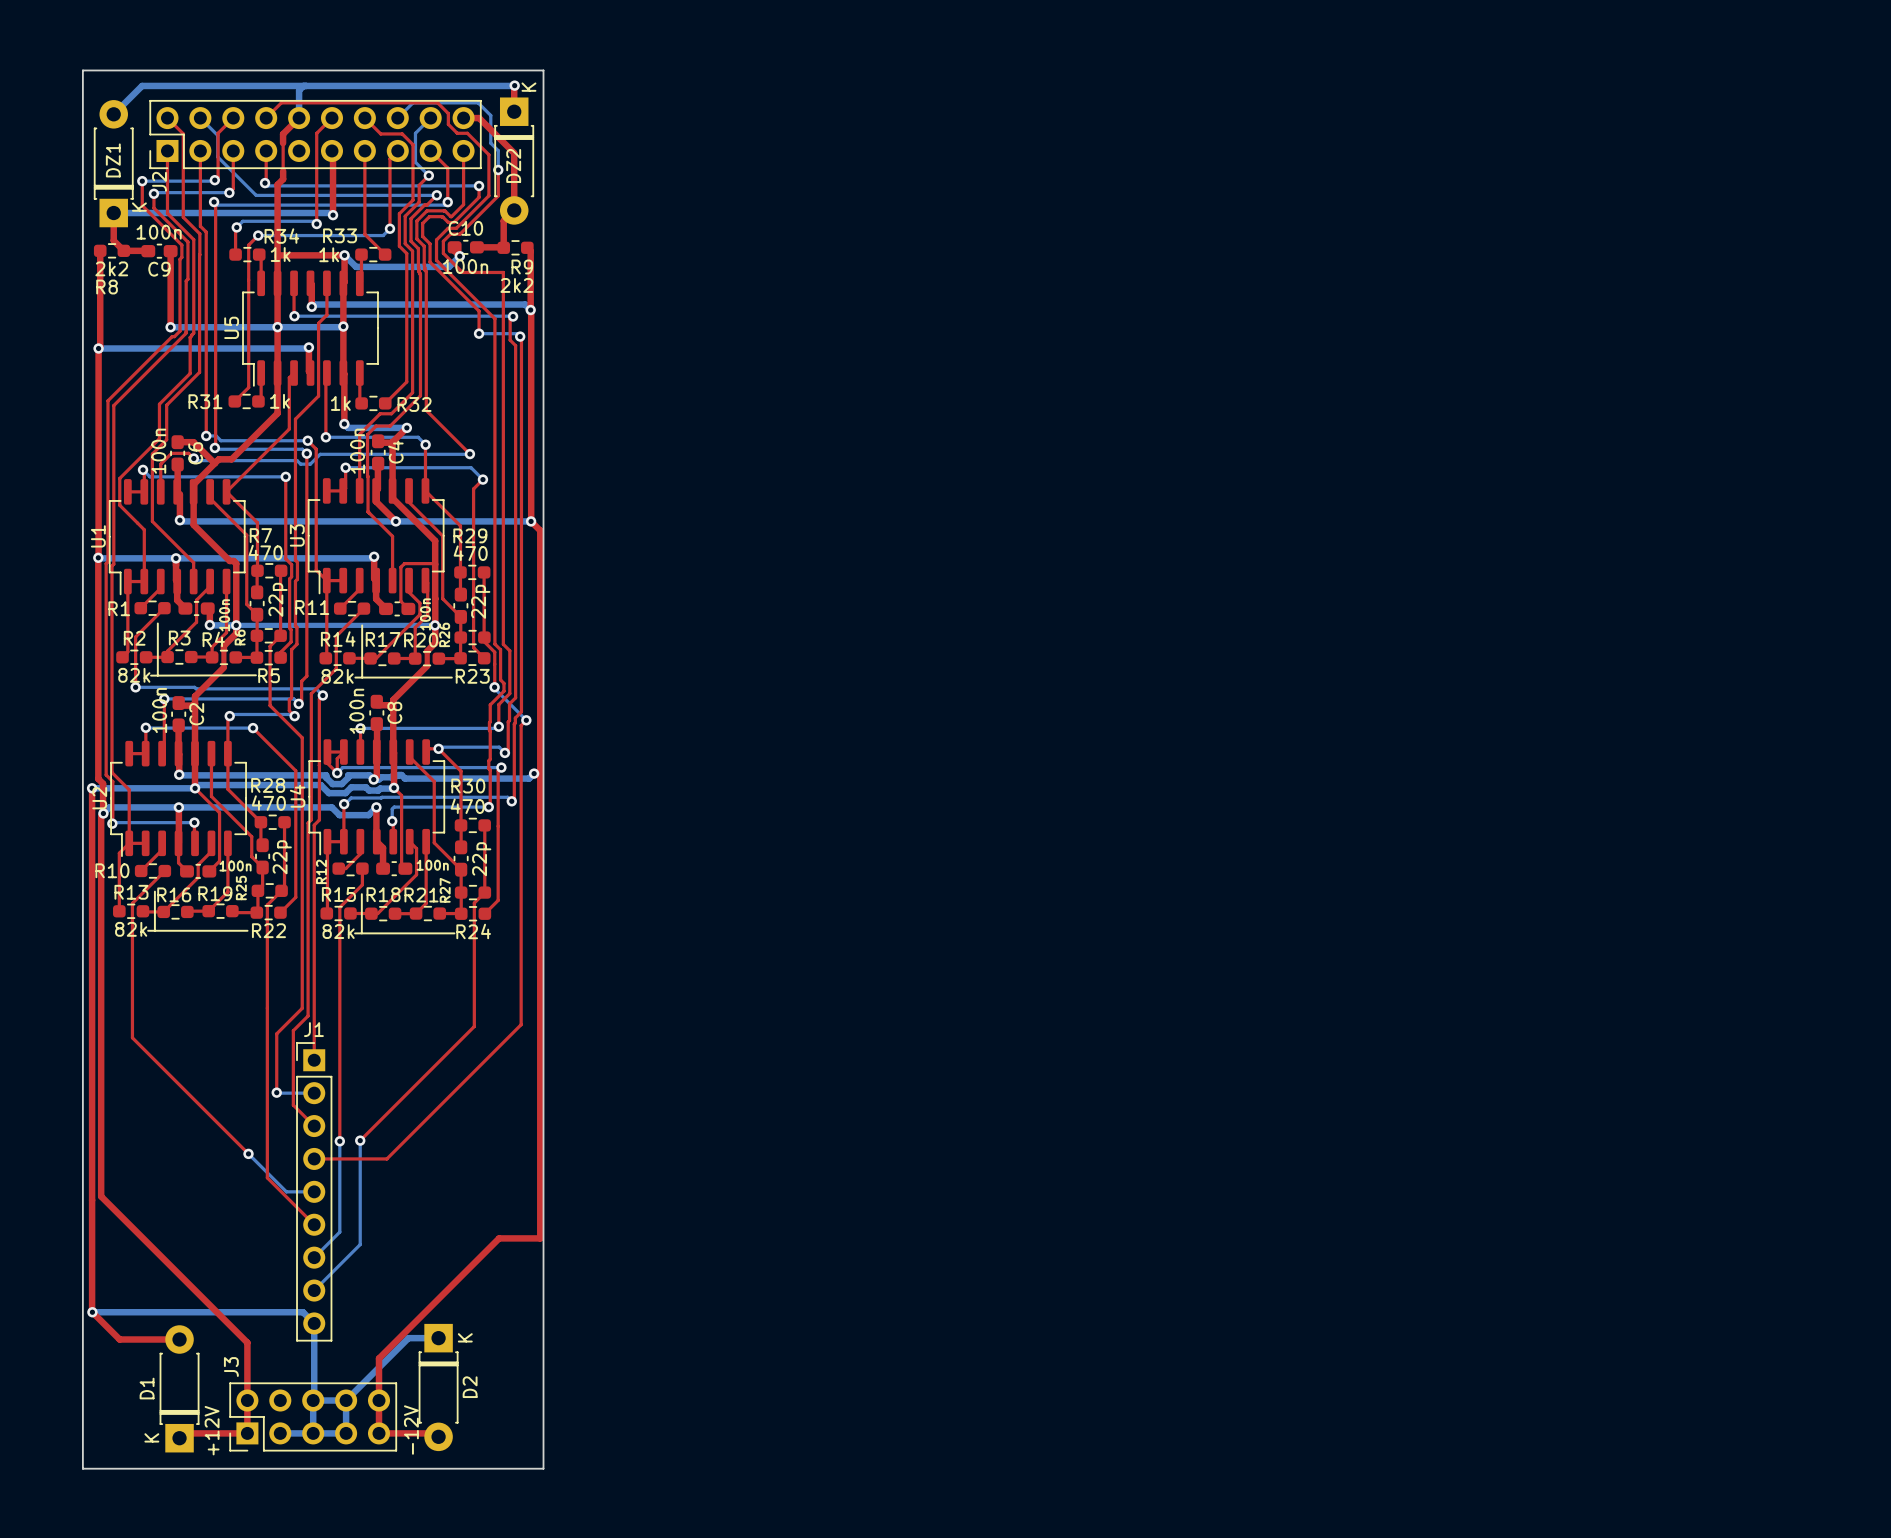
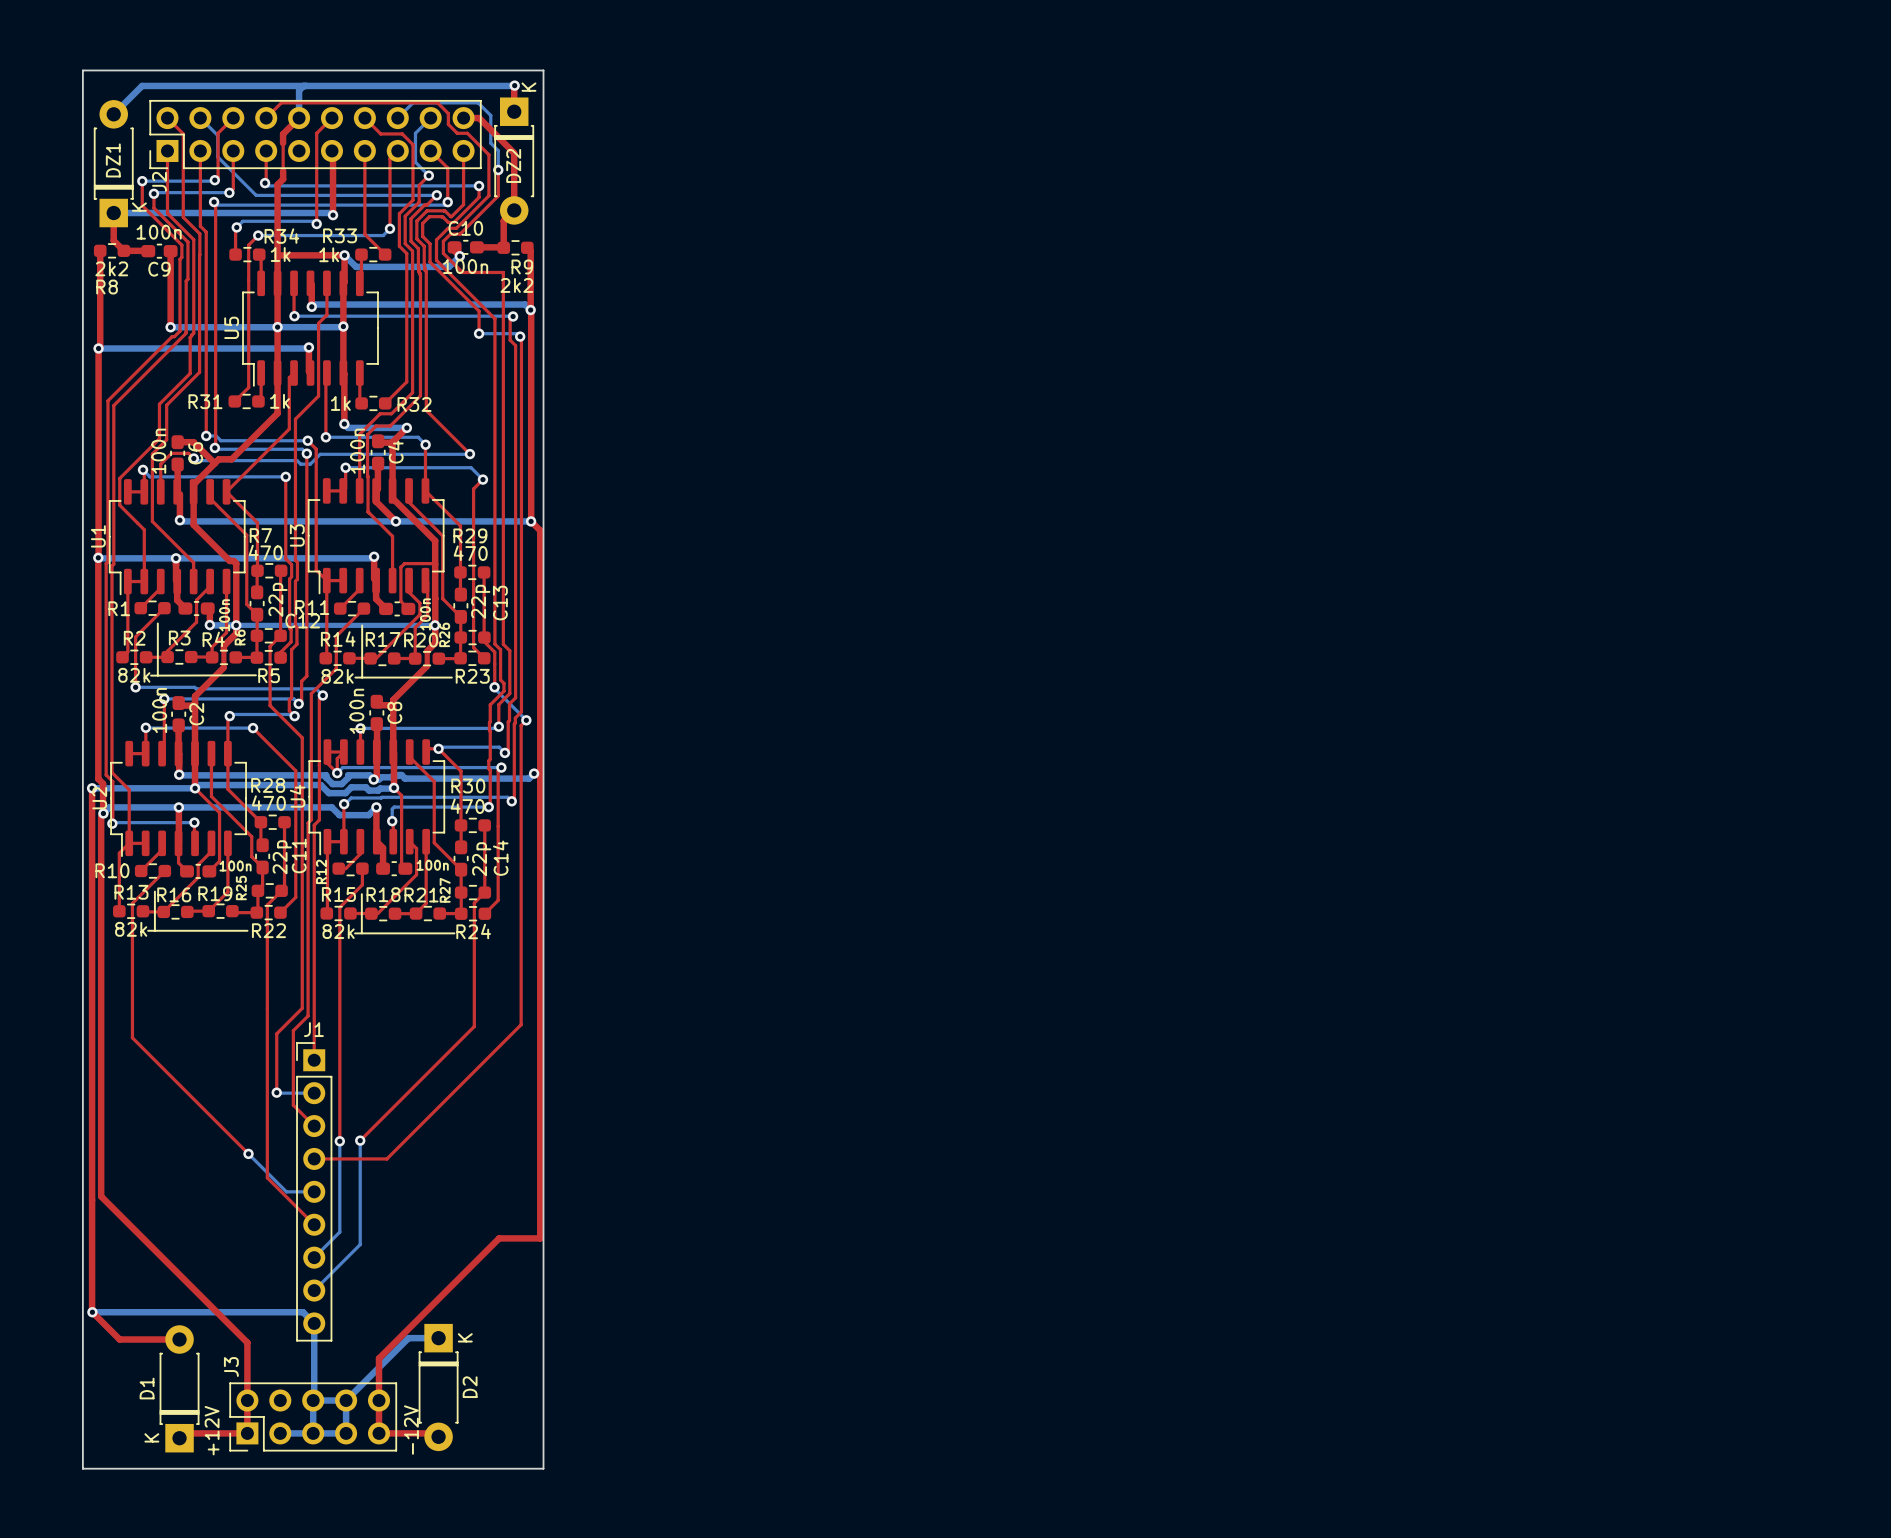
C13 name: none -> C13 (500, 603)
C12 name: none -> C12 (302, 620)
C11 name: none -> C11 (299, 855)
C14 name: none -> C14 (500, 858)

